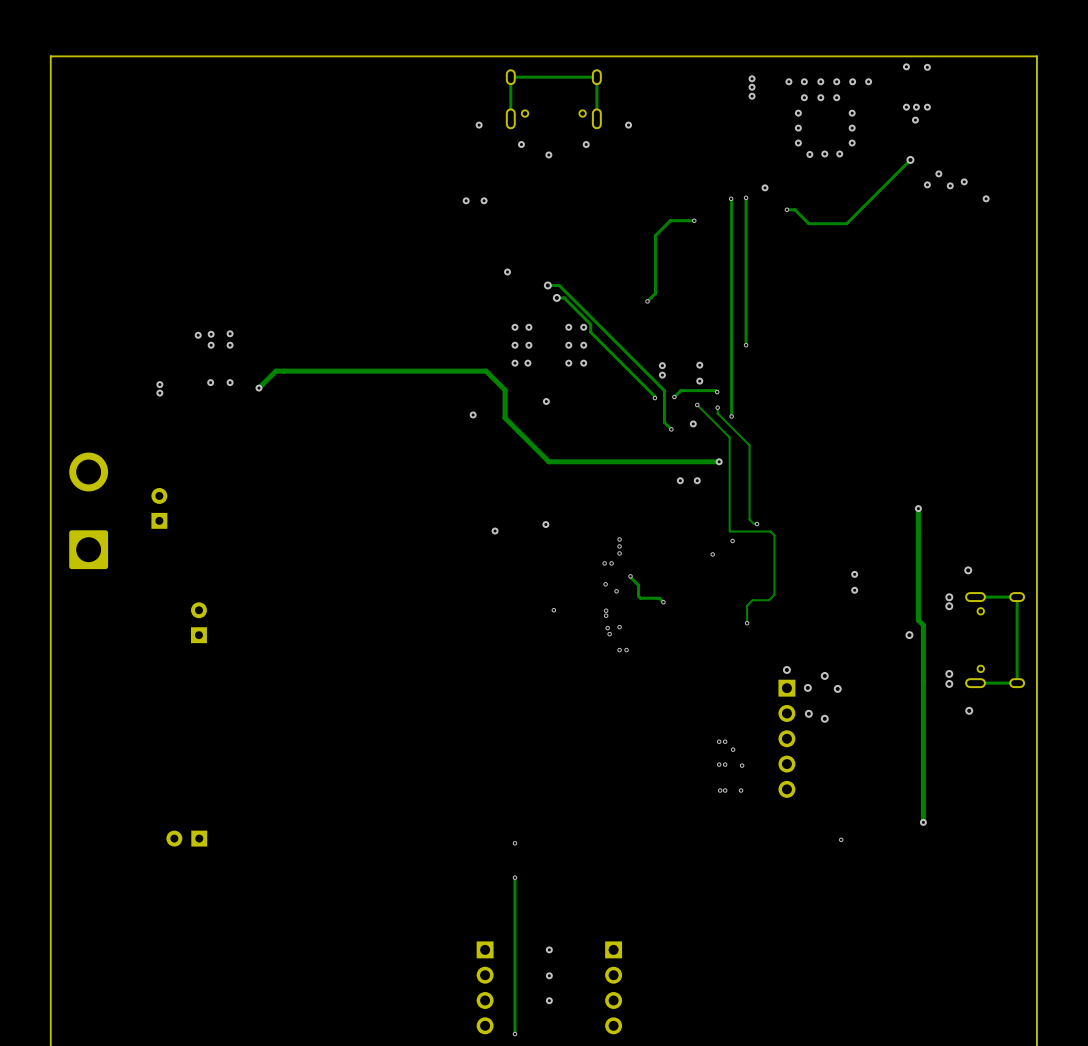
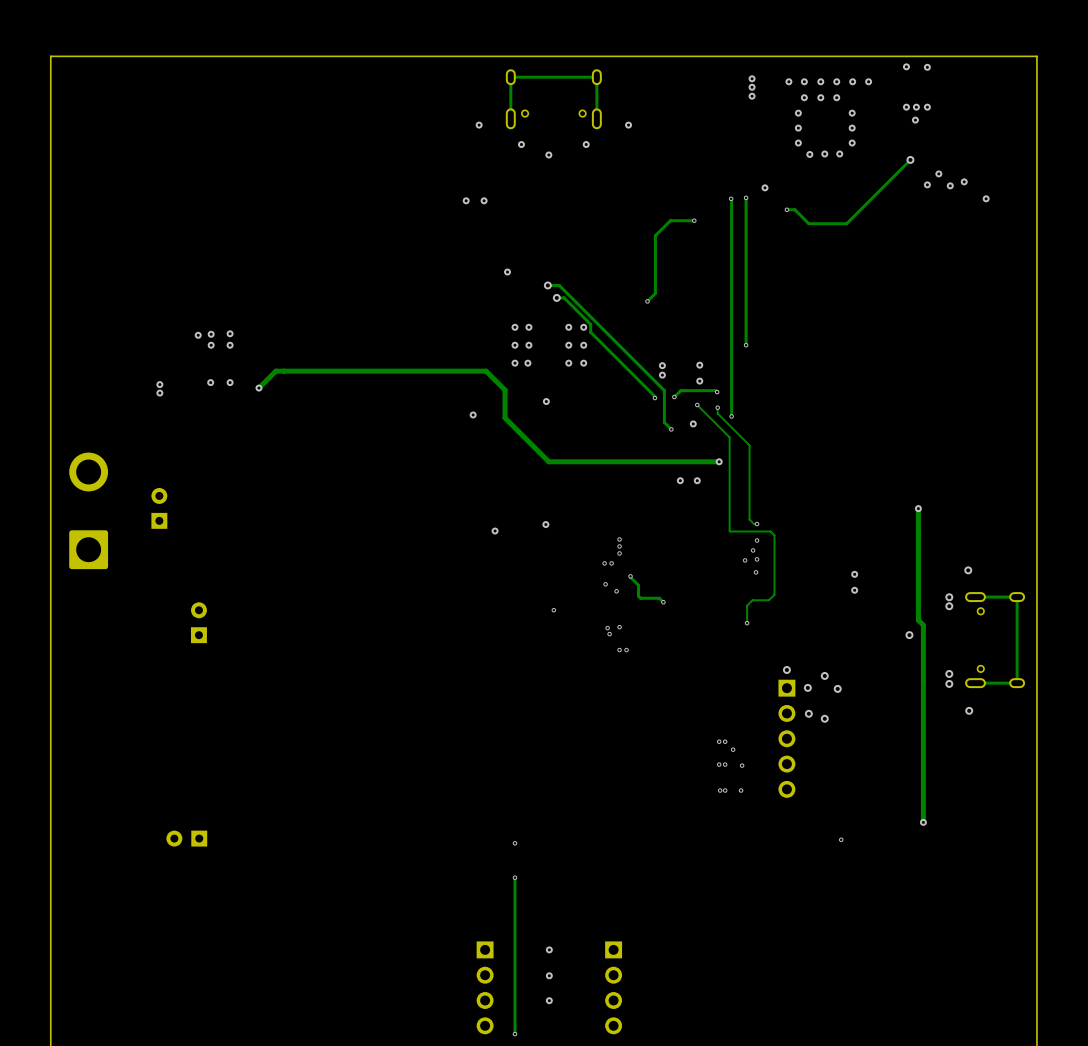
via: (732, 540) -> none
via: none -> (757, 540)
via: none -> (753, 550)
via: (712, 554) -> none
via: none -> (757, 559)
via: none -> (745, 560)
via: none -> (756, 572)
via: (606, 610) -> none
via: (606, 615) -> none

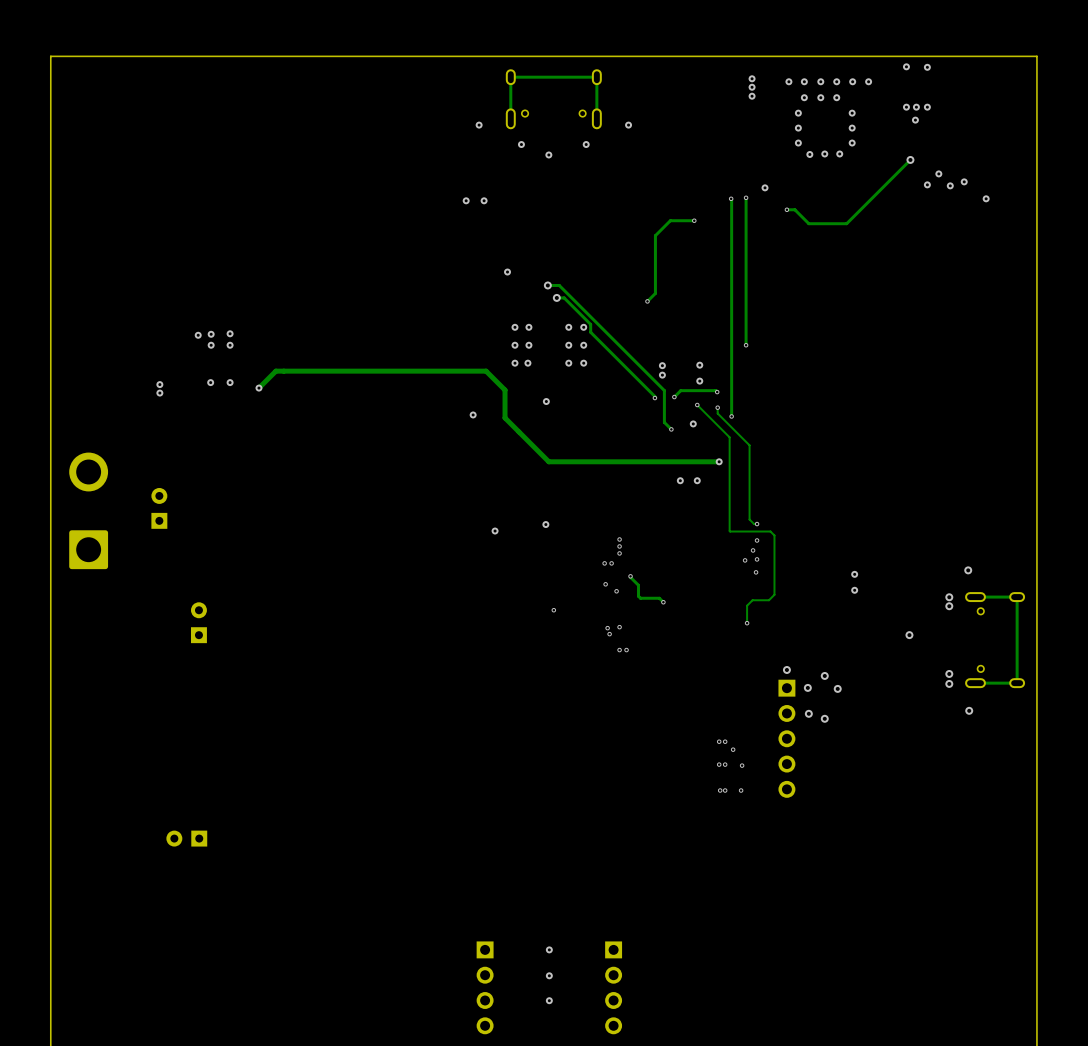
track: (918, 508) (918, 620) (923, 625) (923, 822) -> none
via: (918, 508) -> none
via: (923, 822) -> none
via: (841, 839) -> none
via: (514, 843) -> none
track: (514, 877) (514, 1034) -> none
via: (514, 877) -> none
via: (514, 1034) -> none

